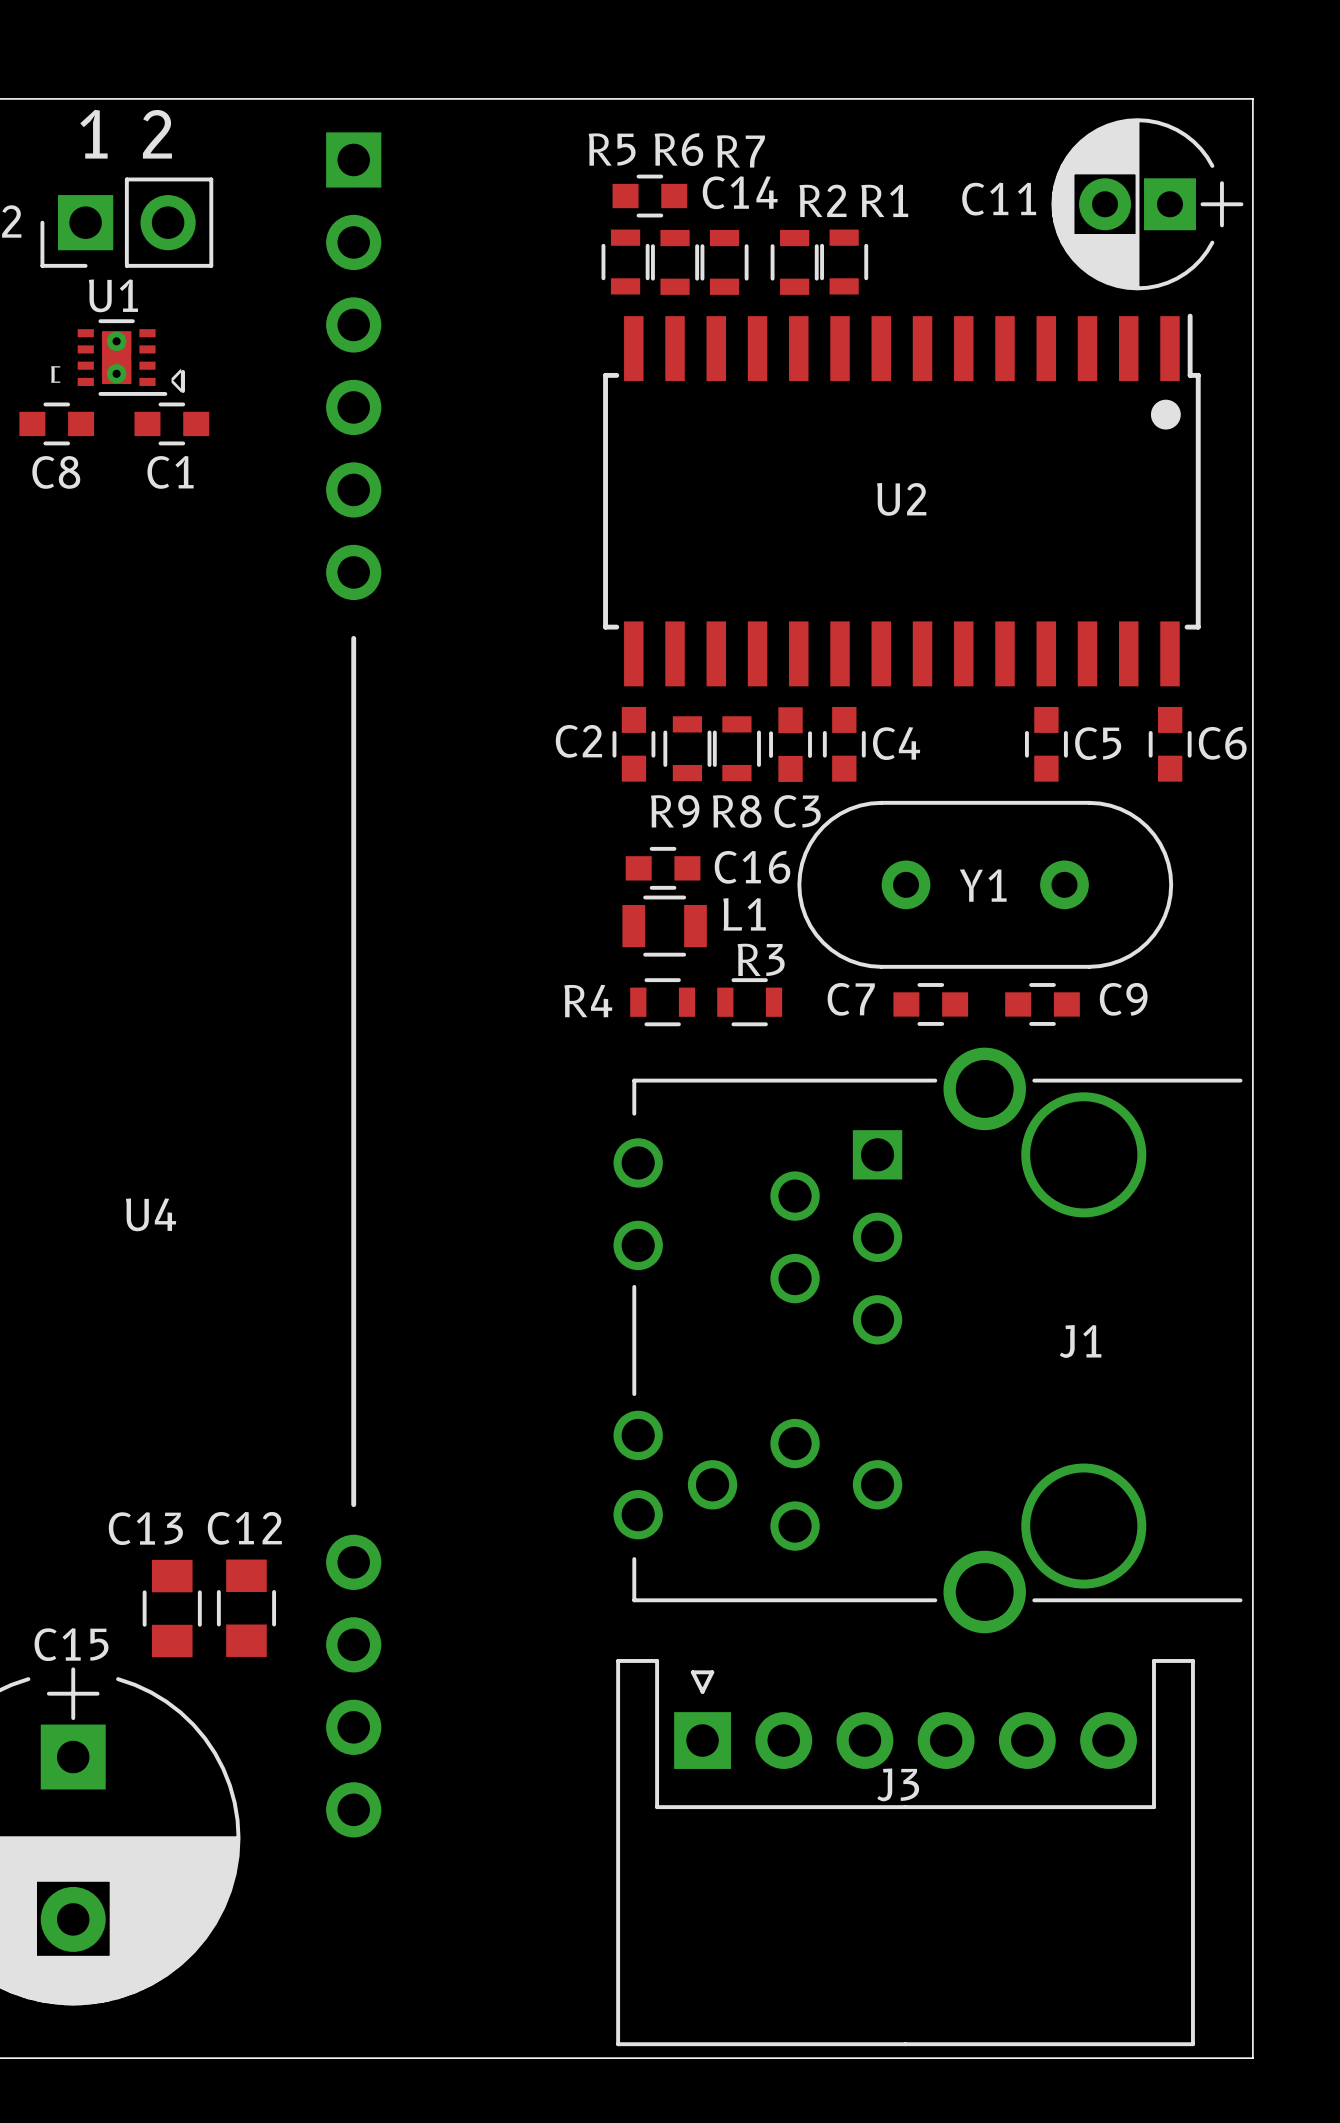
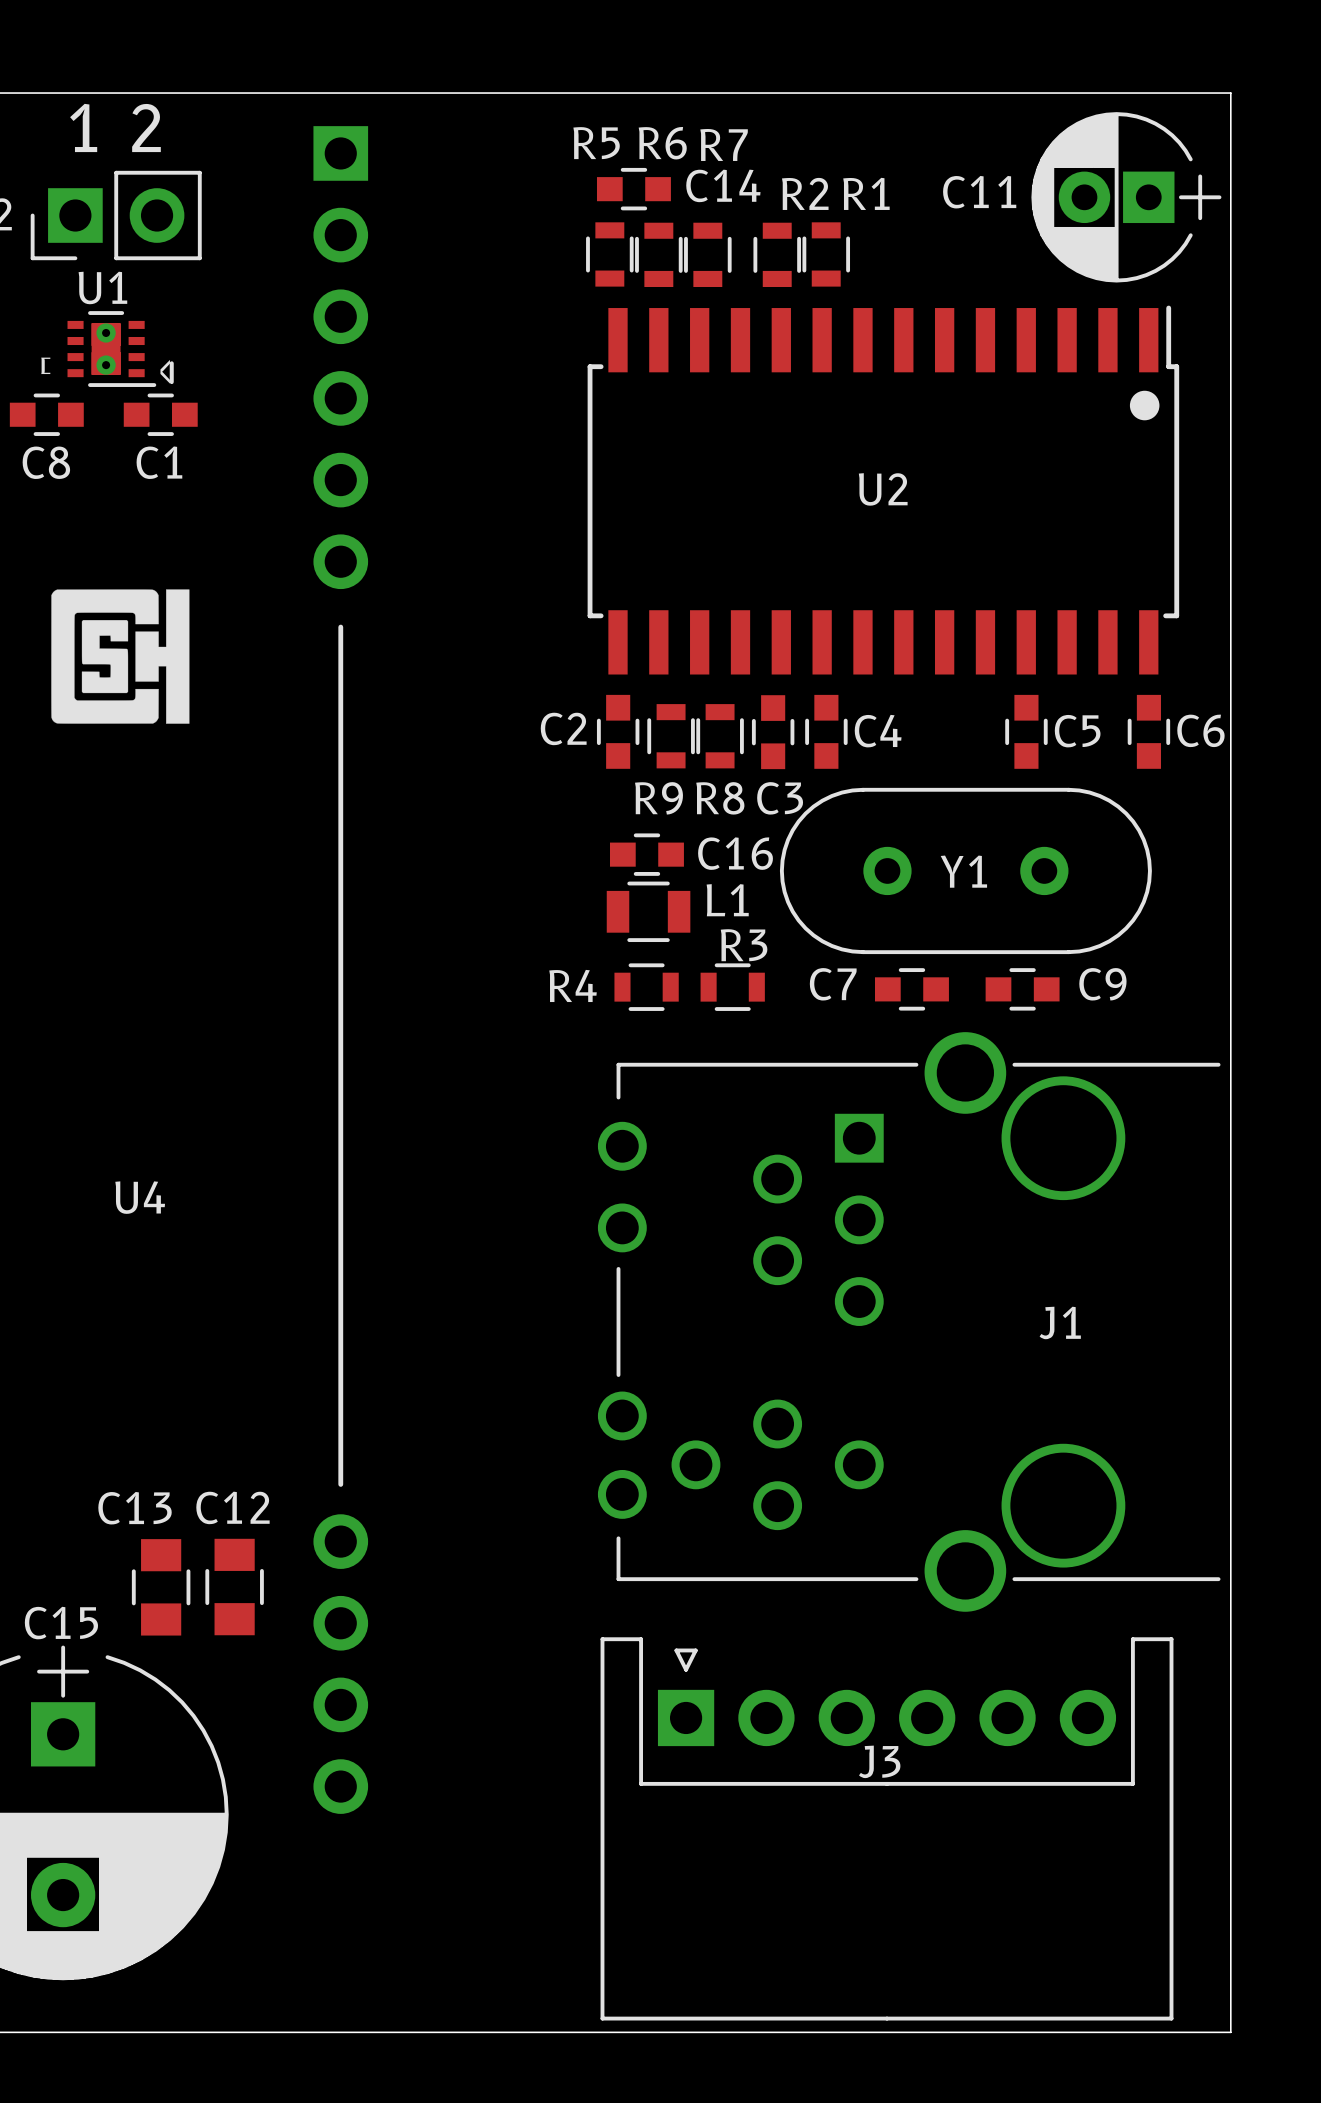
drawing: none -> [51, 589, 190, 724]

